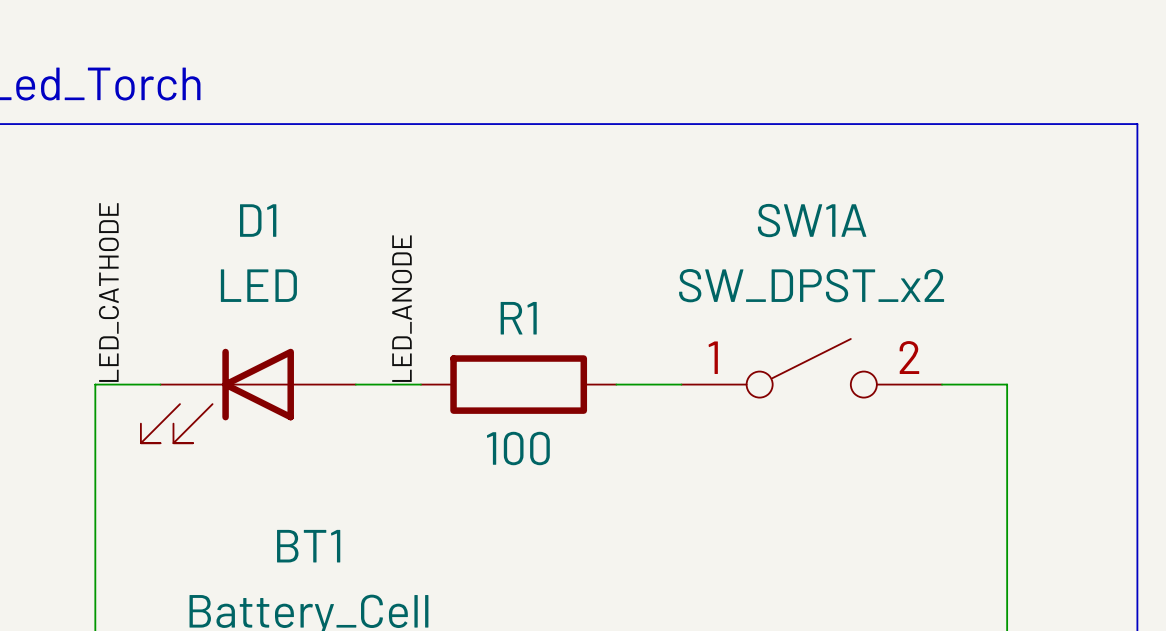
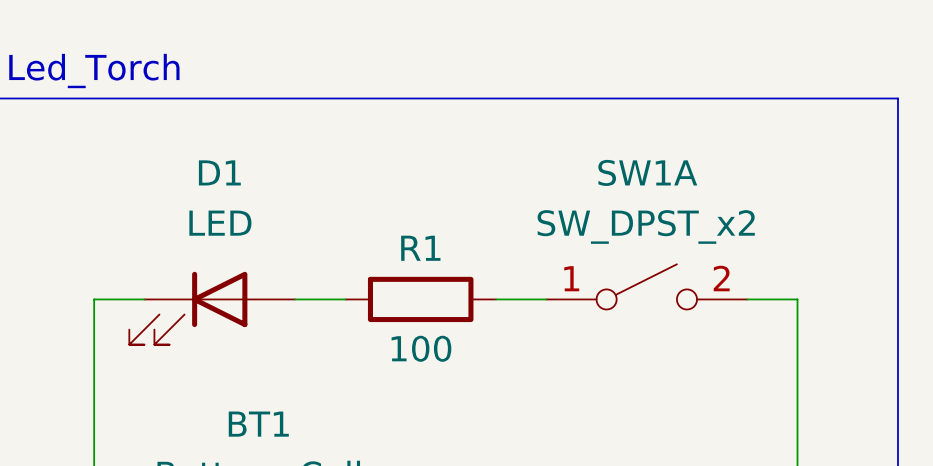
label: LED_CATHODE (108, 292) -> none
label: LED_ANODE (401, 308) -> none

